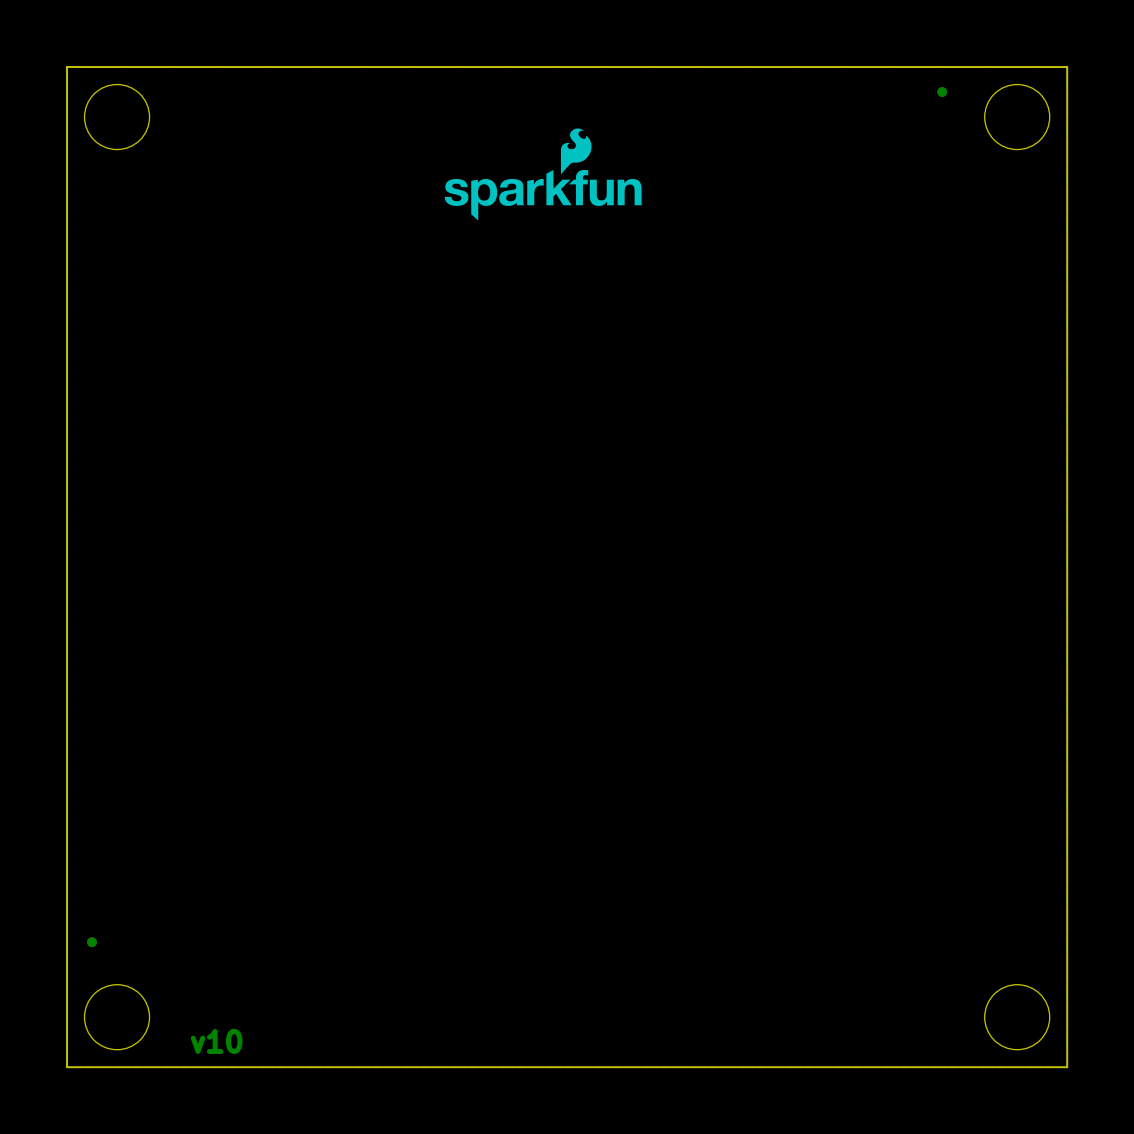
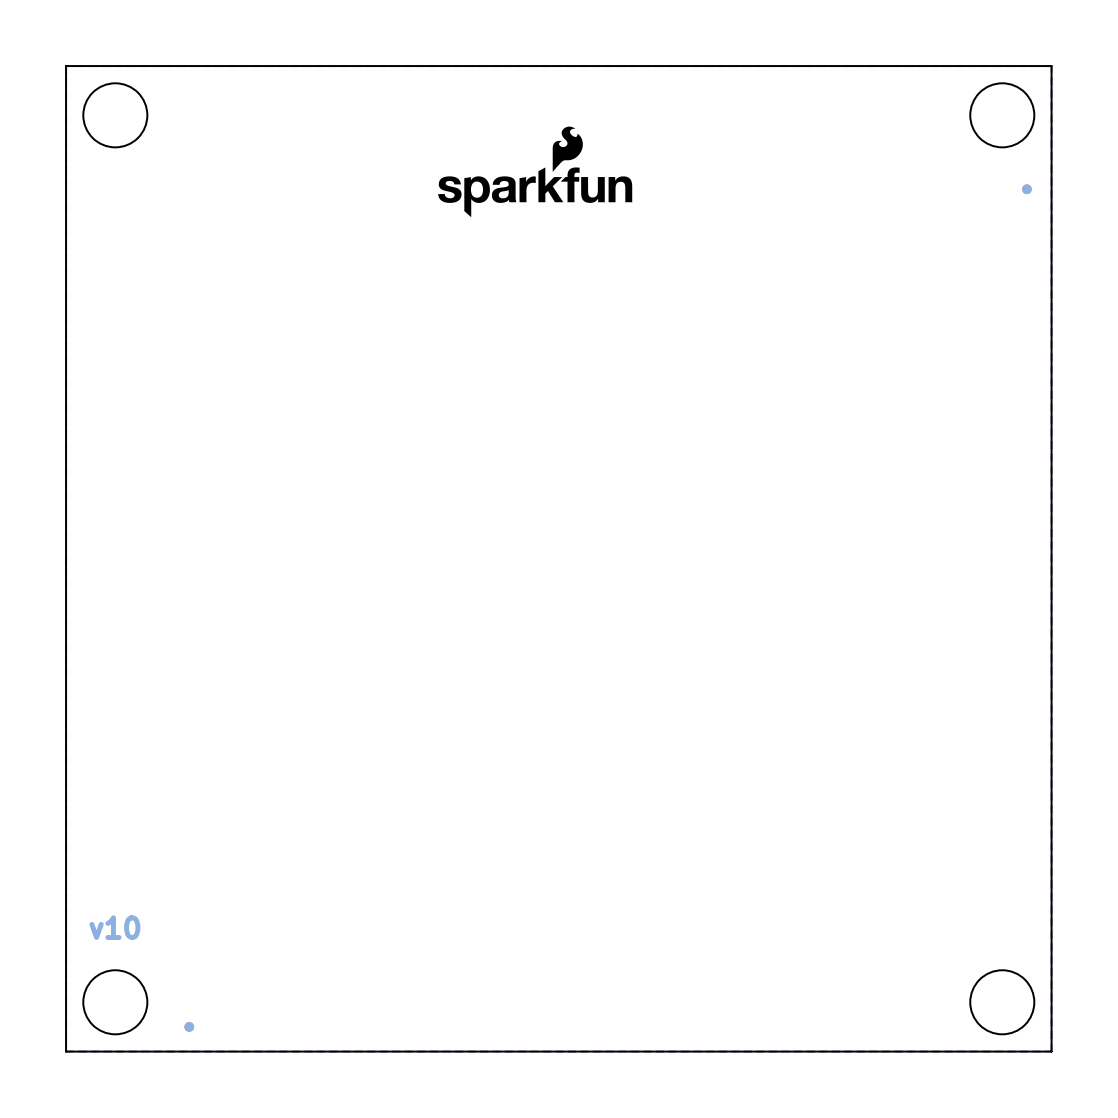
part position: (942, 92) -> (1026, 189)
part position: (92, 942) -> (189, 1026)
text position: v10 (216, 1041) -> v10 (114, 927)

